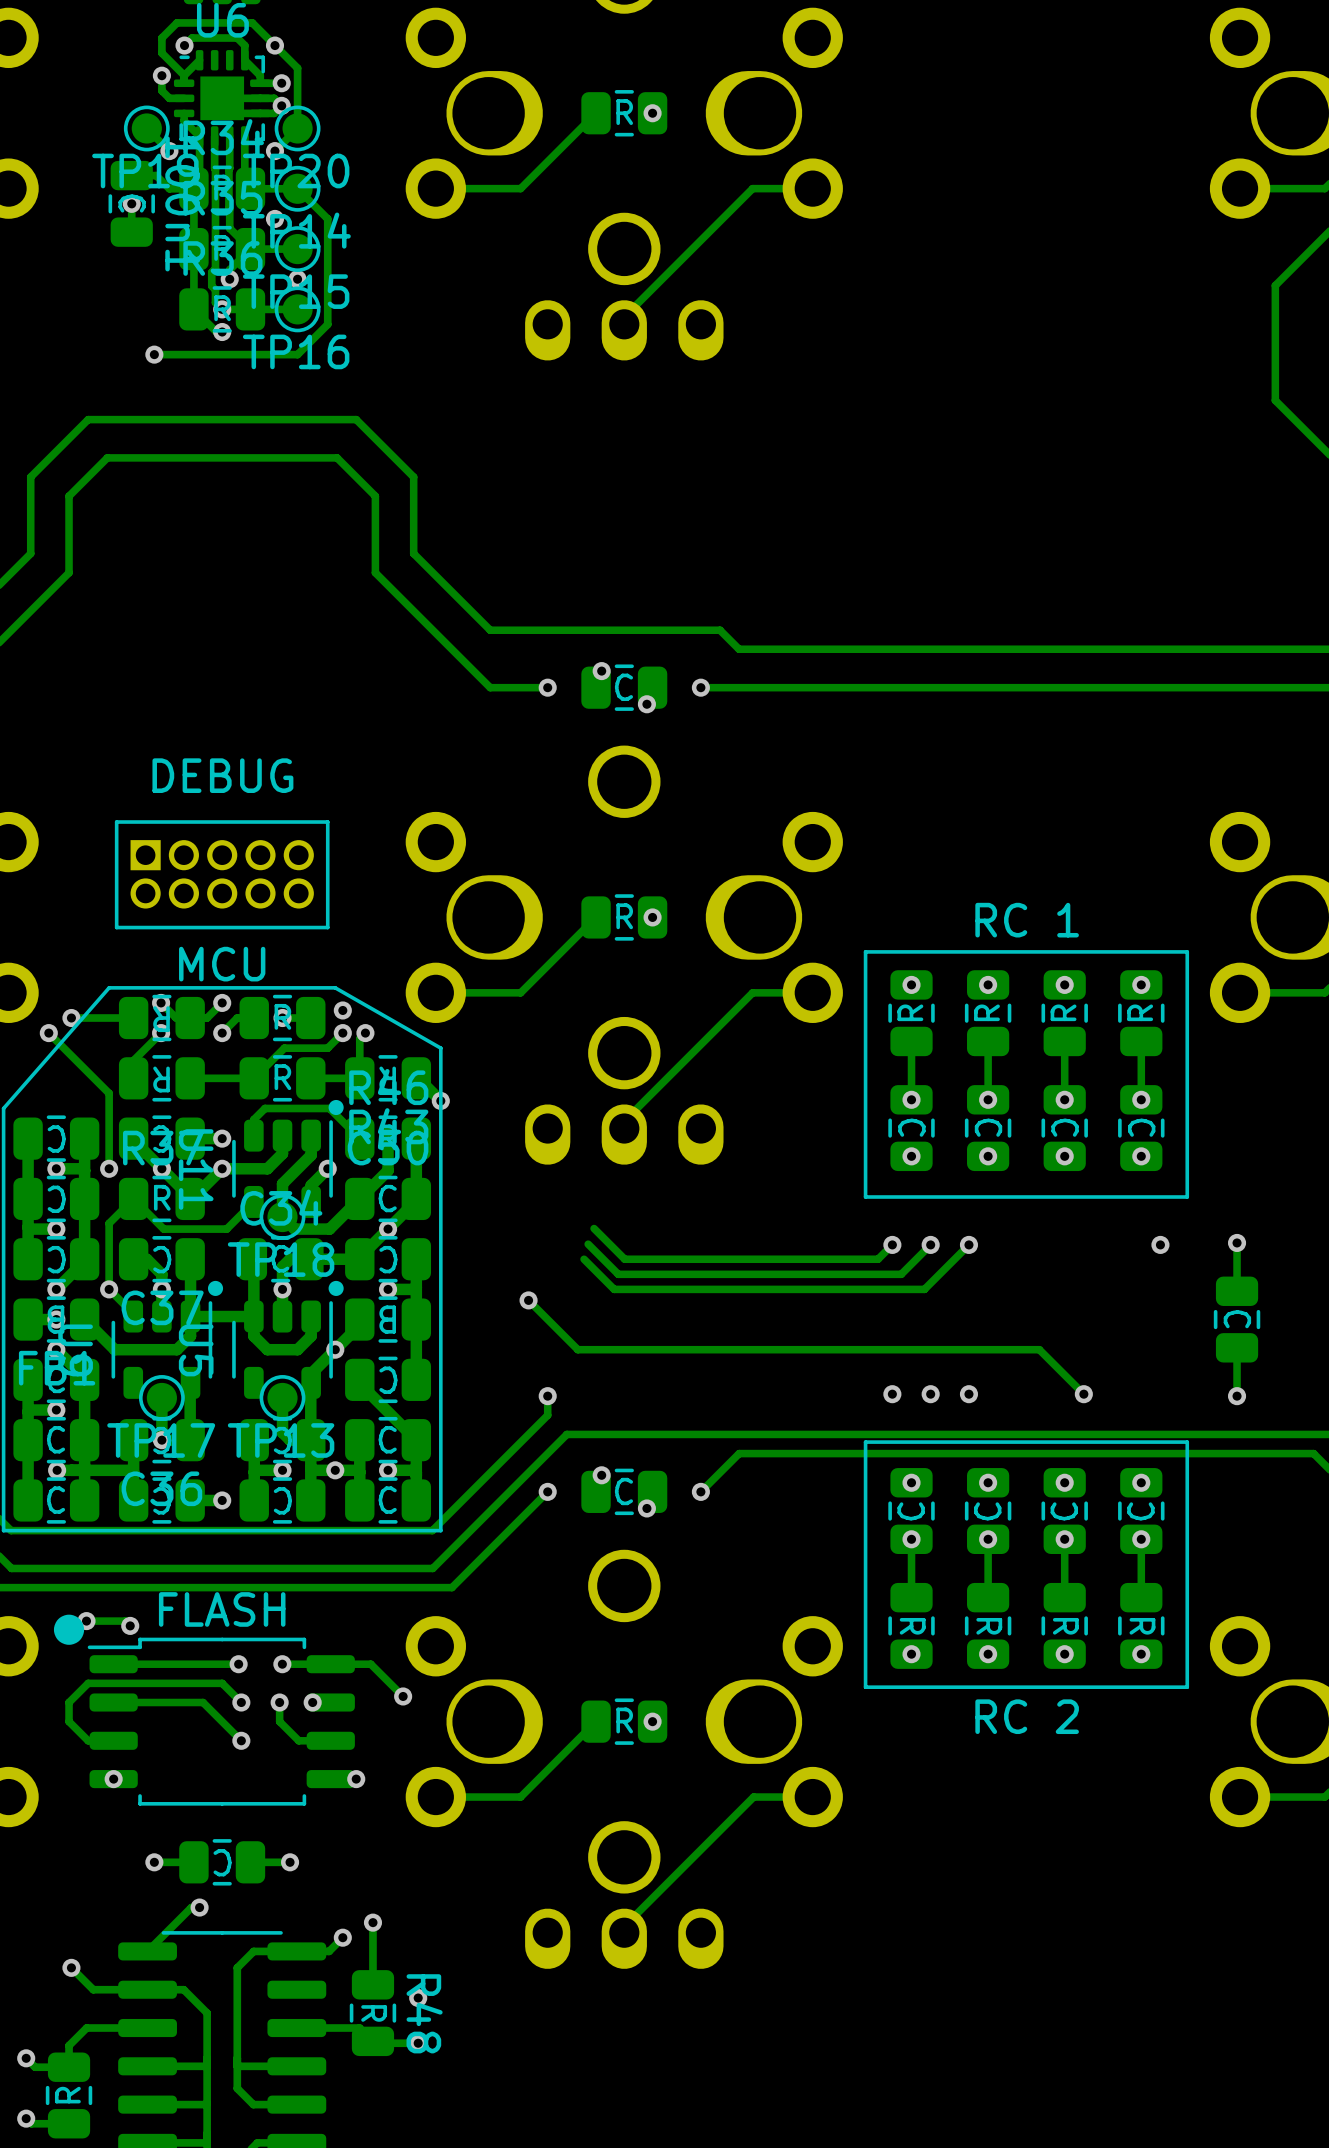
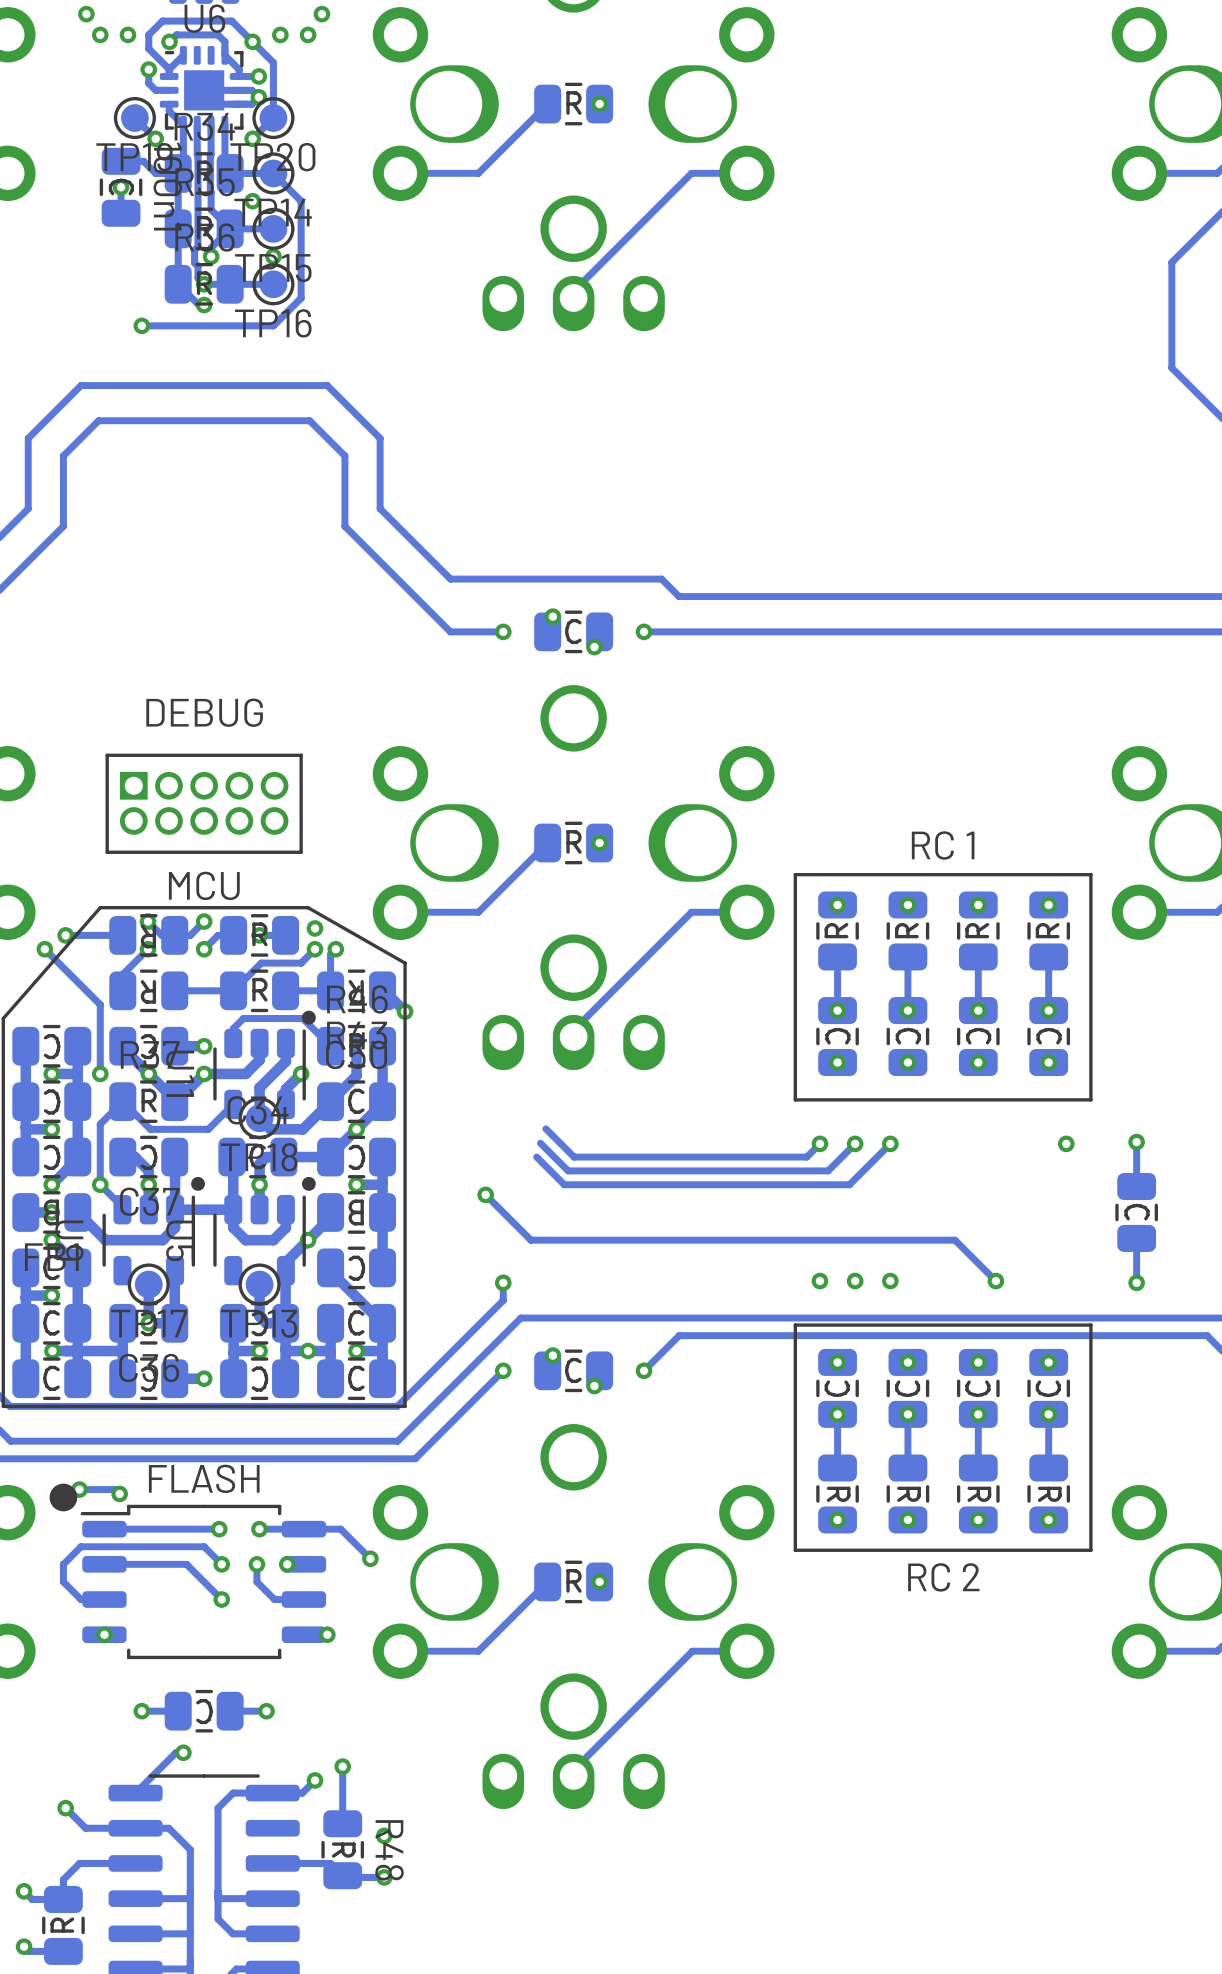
via: none -> (86, 14)
via: none -> (321, 14)
via: none -> (100, 34)
via: none -> (127, 34)
via: none -> (280, 34)
via: none -> (308, 34)

